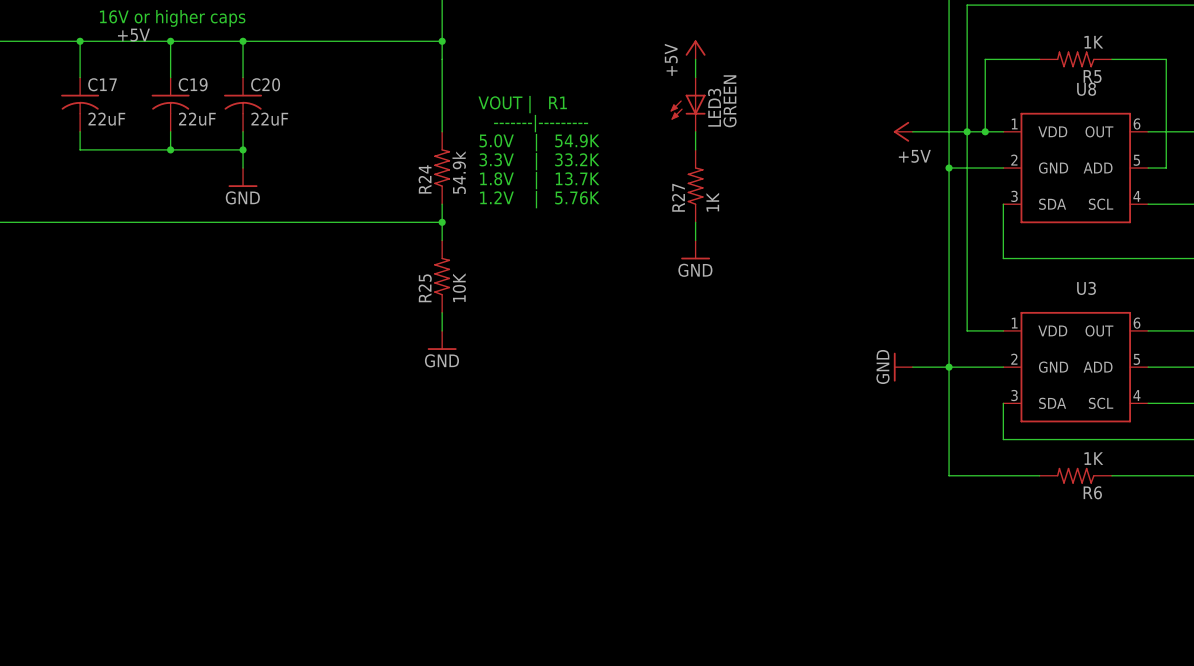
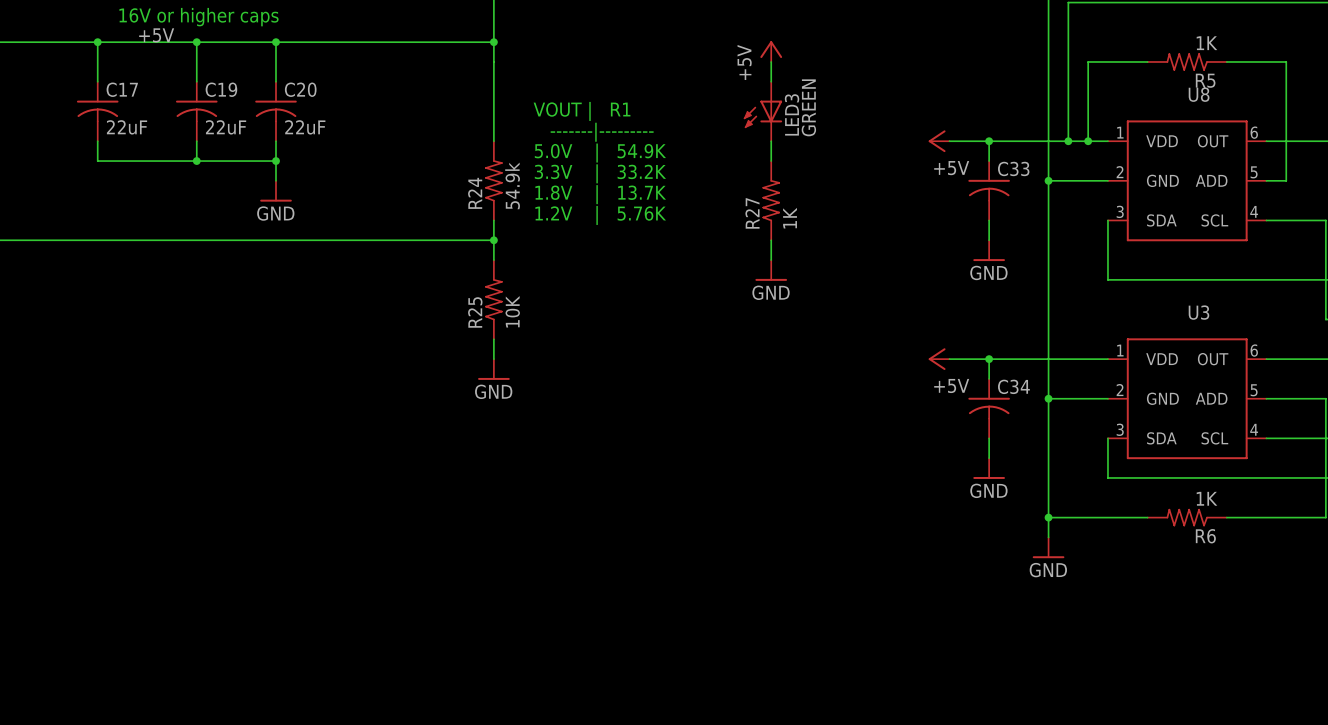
wire: none -> (949, 141) (1008, 141)
wire: none -> (989, 141) (989, 161)
junction: none -> (989, 141)
power symbol position: +5V (903, 131) -> +5V (939, 141)
wire: (967, 131) (967, 330) -> (949, 359) (1068, 359)
C33: none -> (989, 190)
wire: none -> (989, 220) (989, 240)
power symbol: none -> GND (989, 250)
power symbol: none -> +5V (939, 359)
wire: none -> (989, 359) (989, 378)
junction: none -> (989, 359)
power symbol rotation: 0° (894, 367) -> 90° counterclockwise (989, 477)
power symbol position: GND (903, 367) -> GND (989, 468)
wire: (912, 367) (949, 367) -> none
C34: none -> (989, 408)
wire: none -> (989, 438) (989, 458)
wire: none -> (1048, 517) (1048, 537)
junction: none -> (1048, 517)
power symbol: none -> GND (1048, 547)

